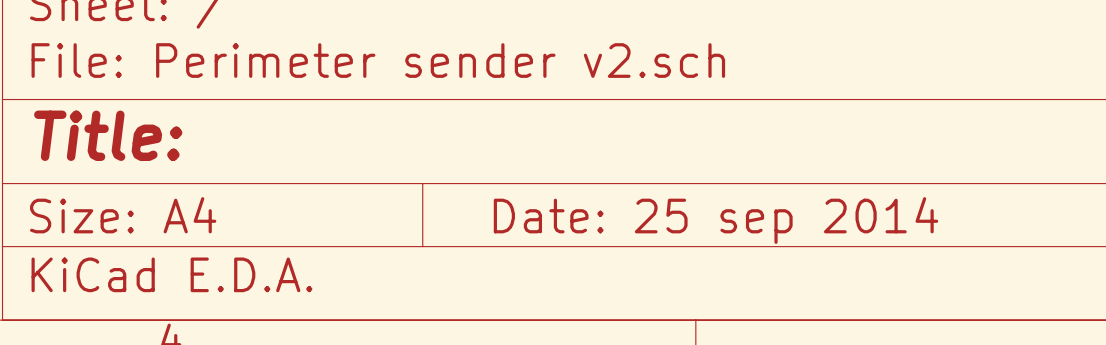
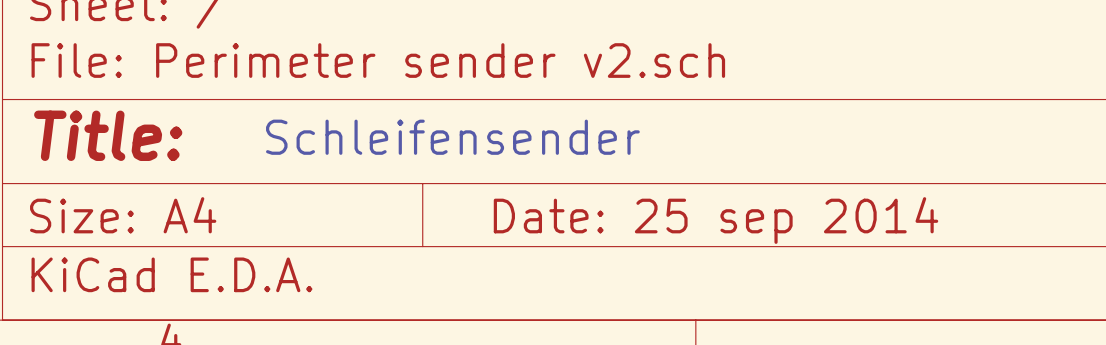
text: none -> Schleifensender (452, 137)

